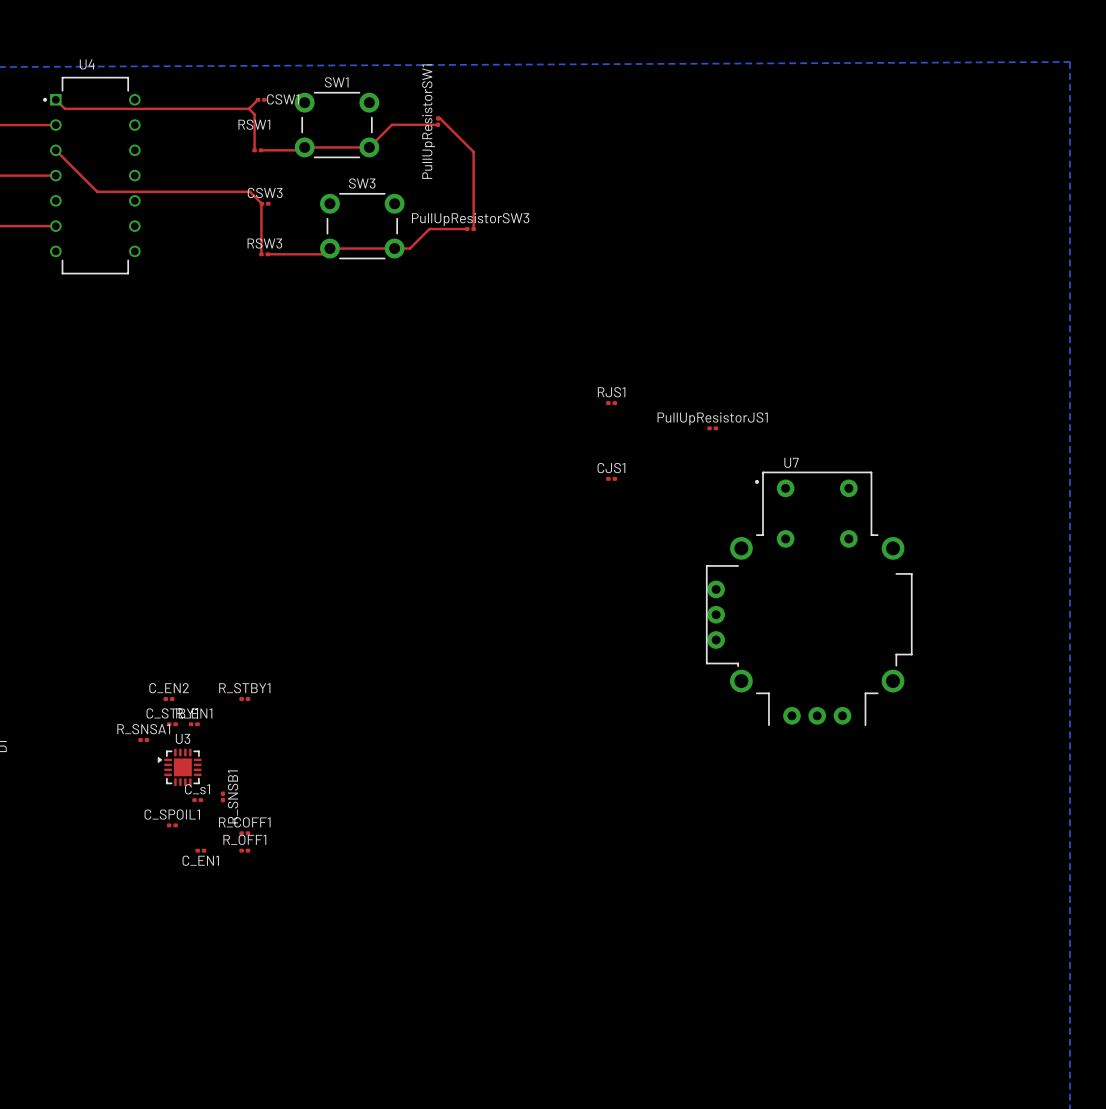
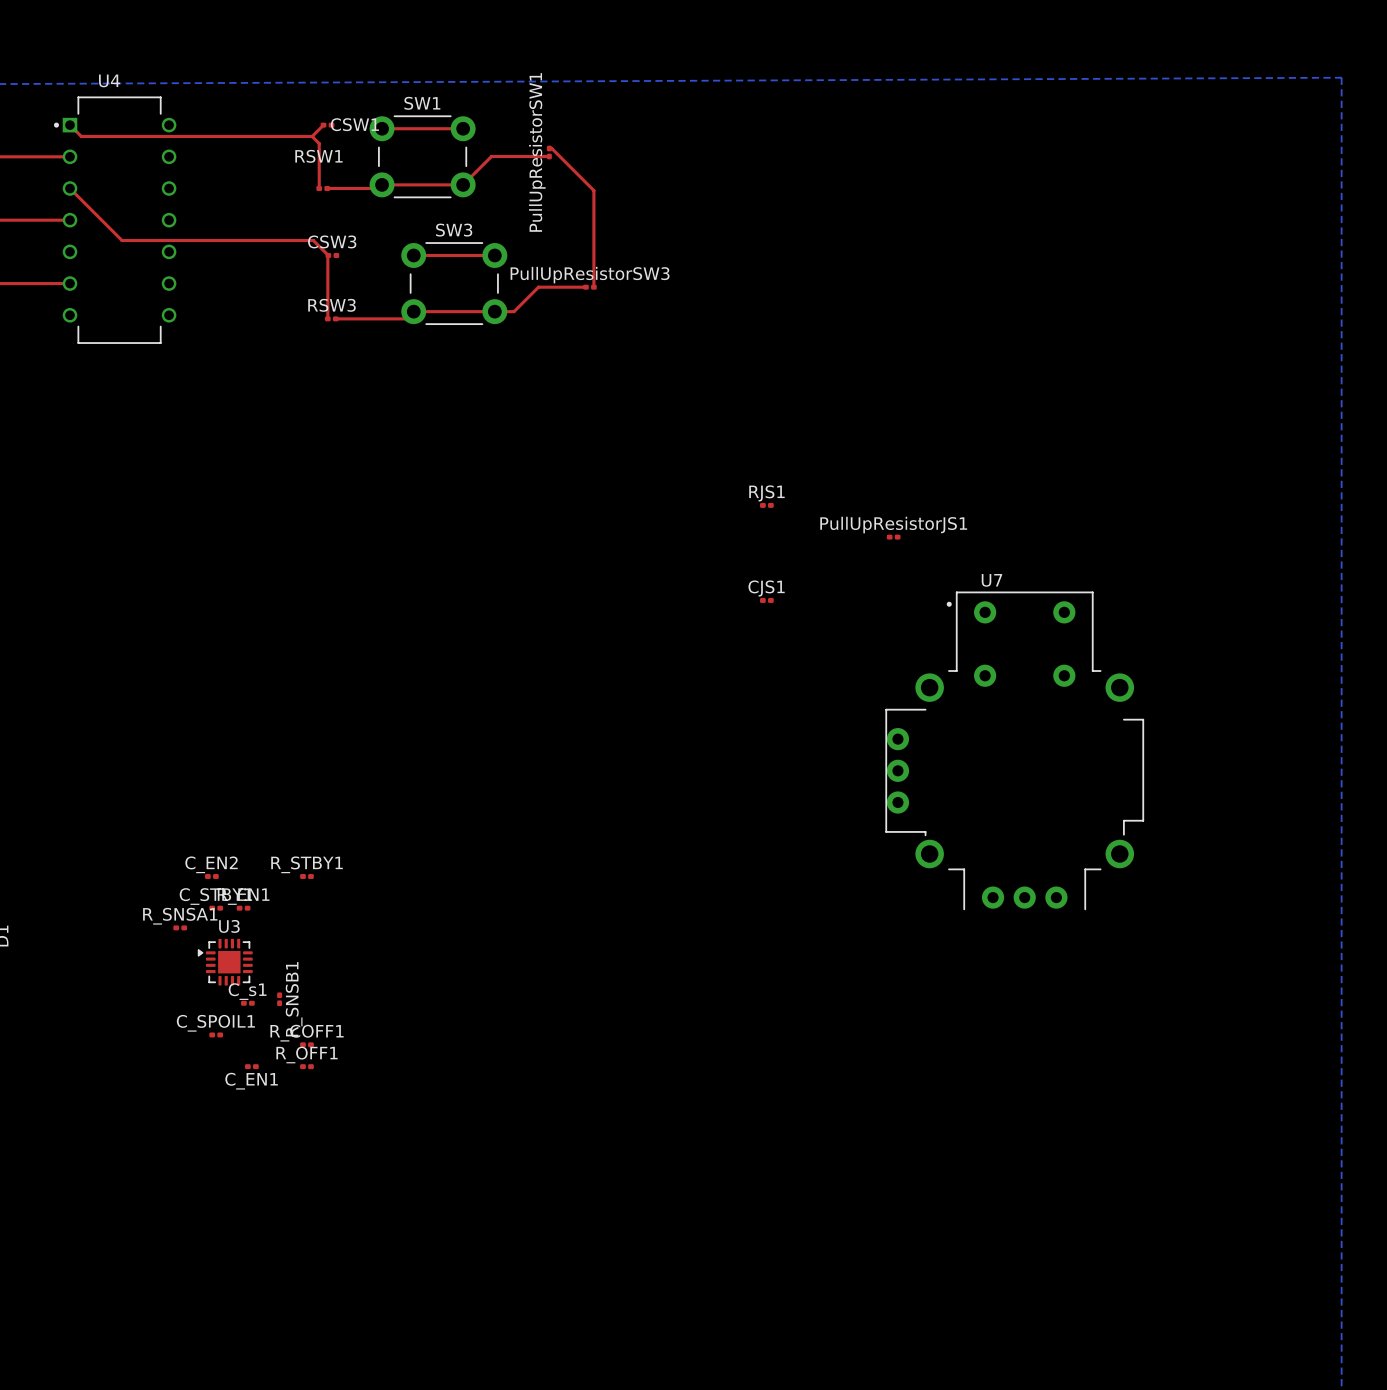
top track: none -> (382, 128) (463, 128)
top track: none -> (413, 255) (494, 255)

